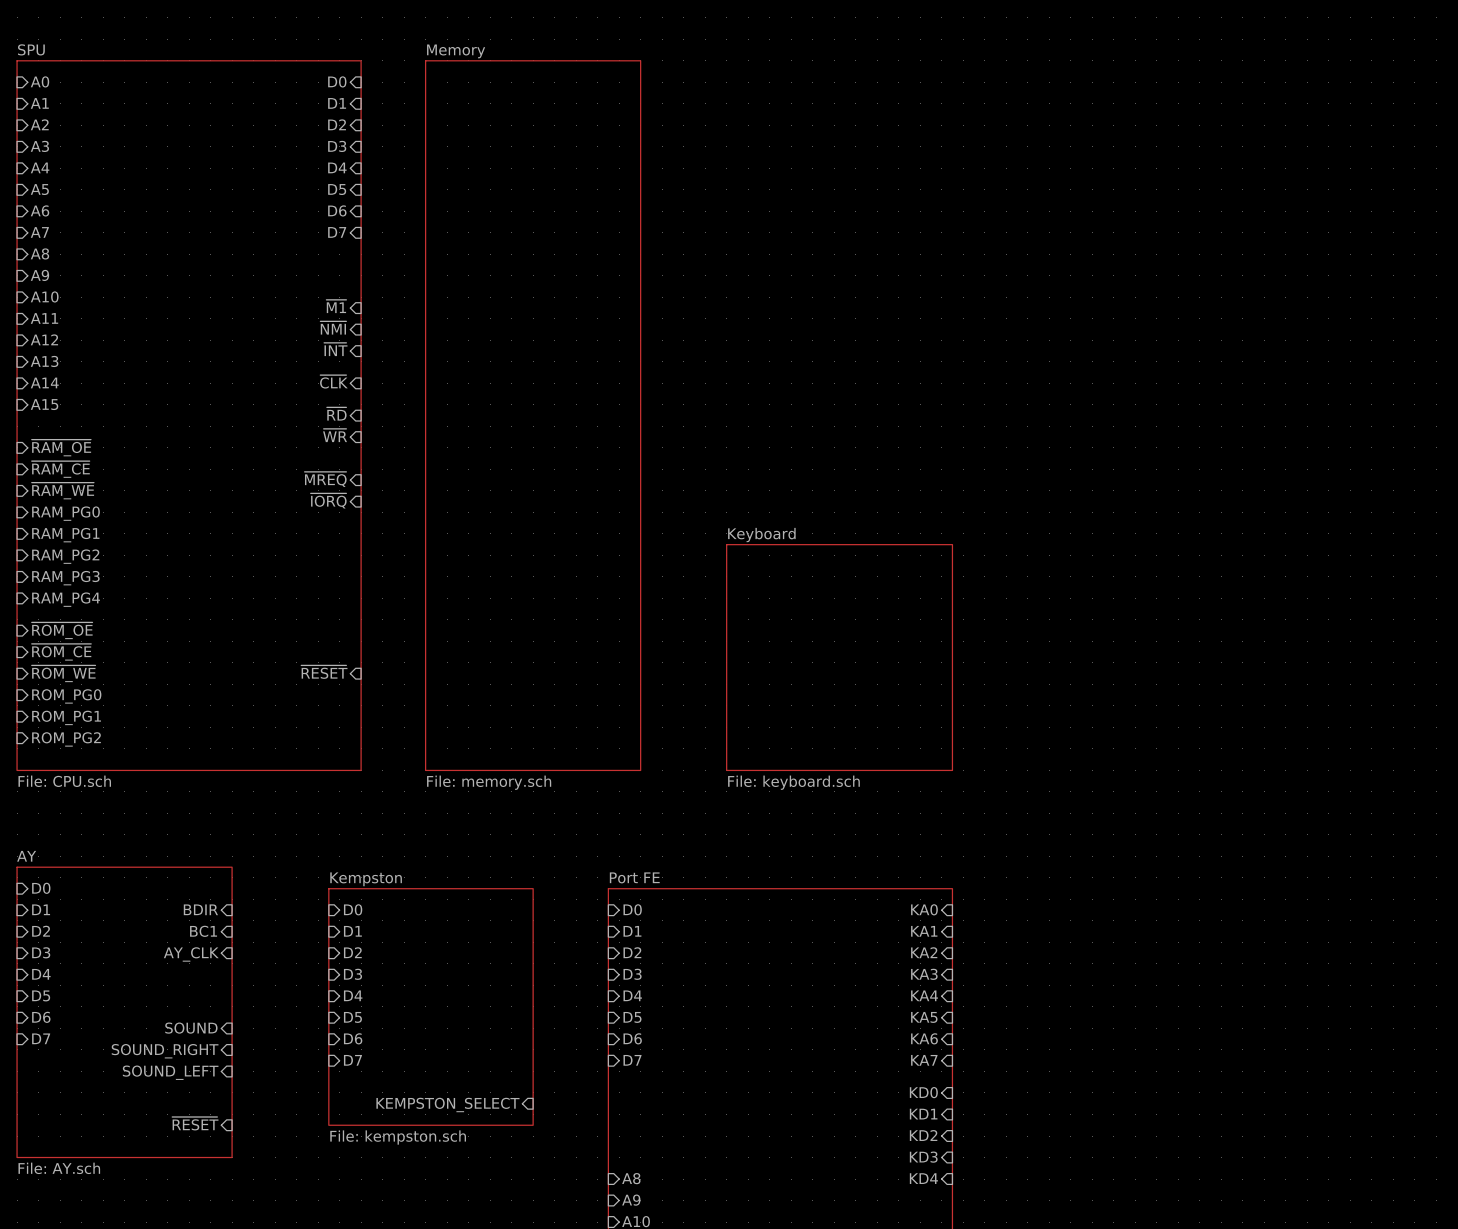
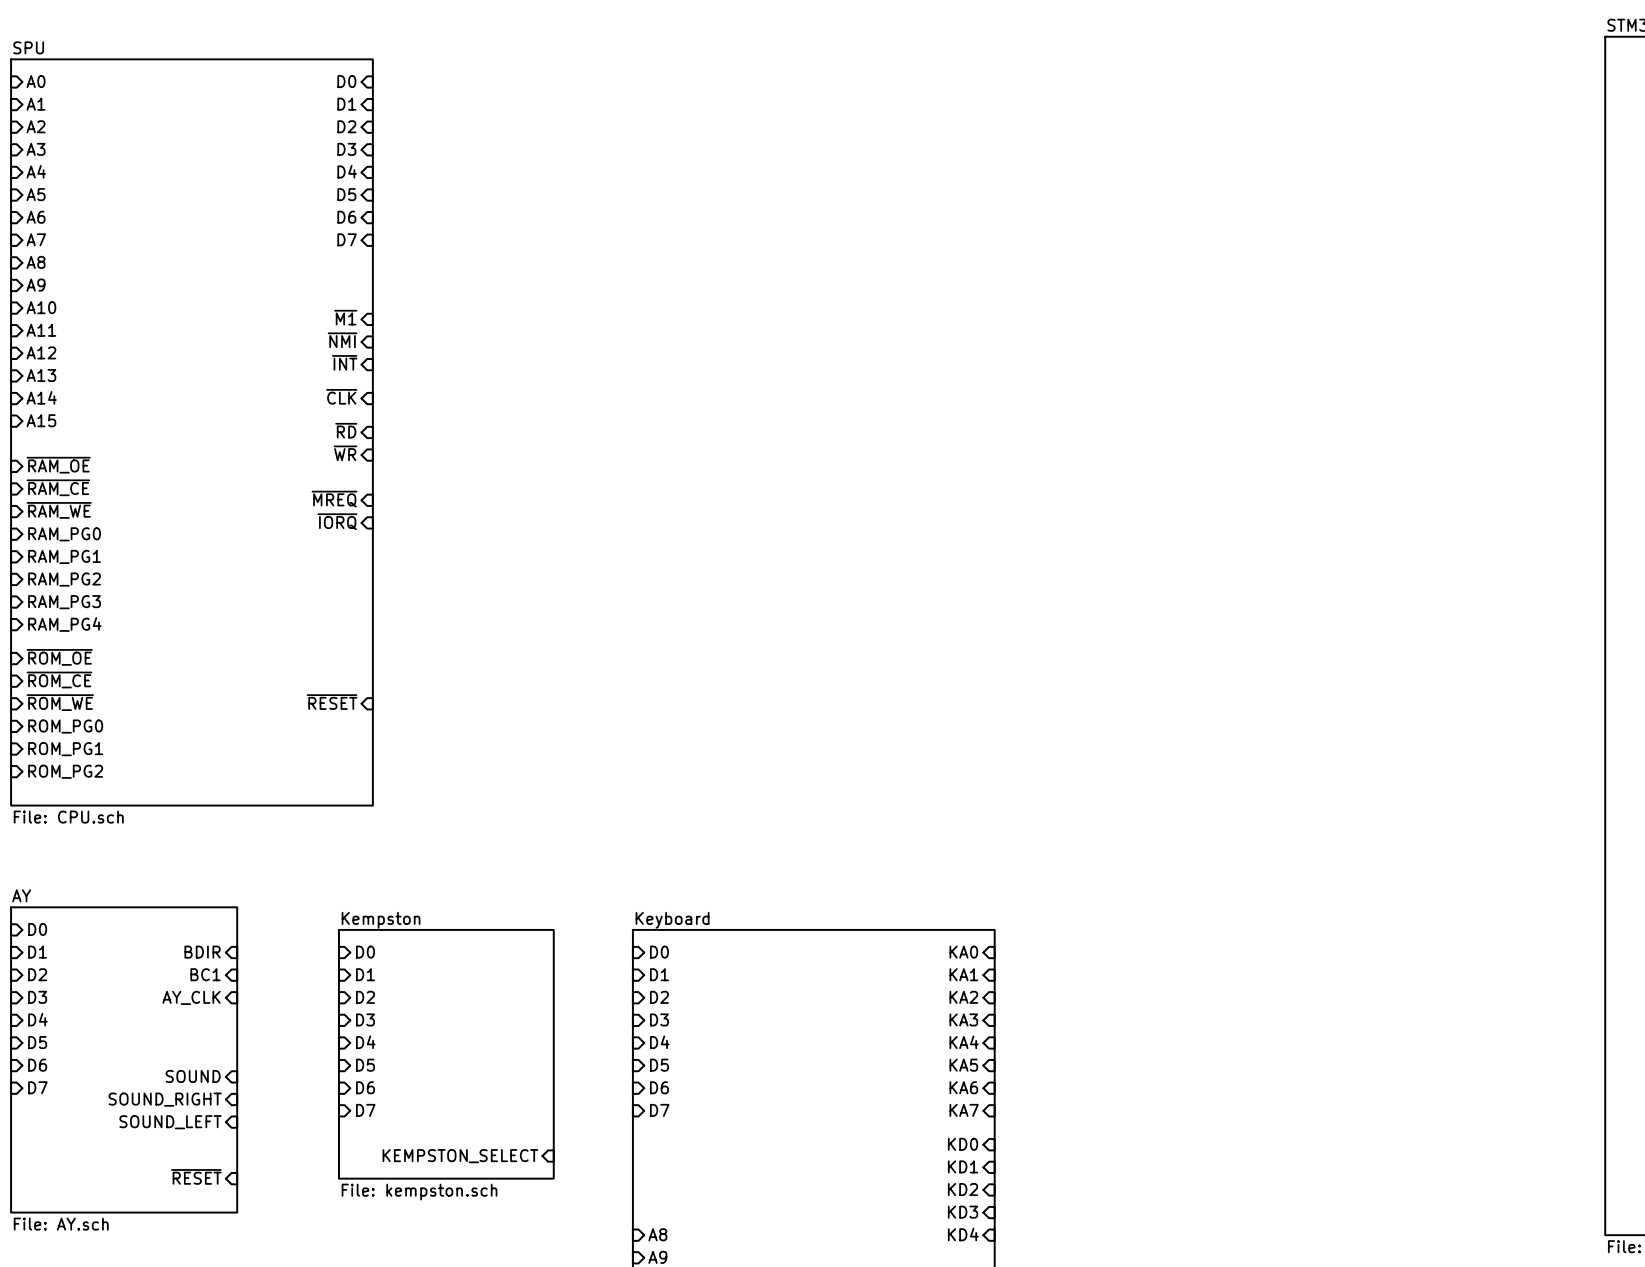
sheet Memory: File: memory.sch (533, 415) -> none
sheet Keyboard: File: keyboard.sch (839, 657) -> none
sheet Port FE name: Port FE (634, 877) -> Keyboard (672, 920)

